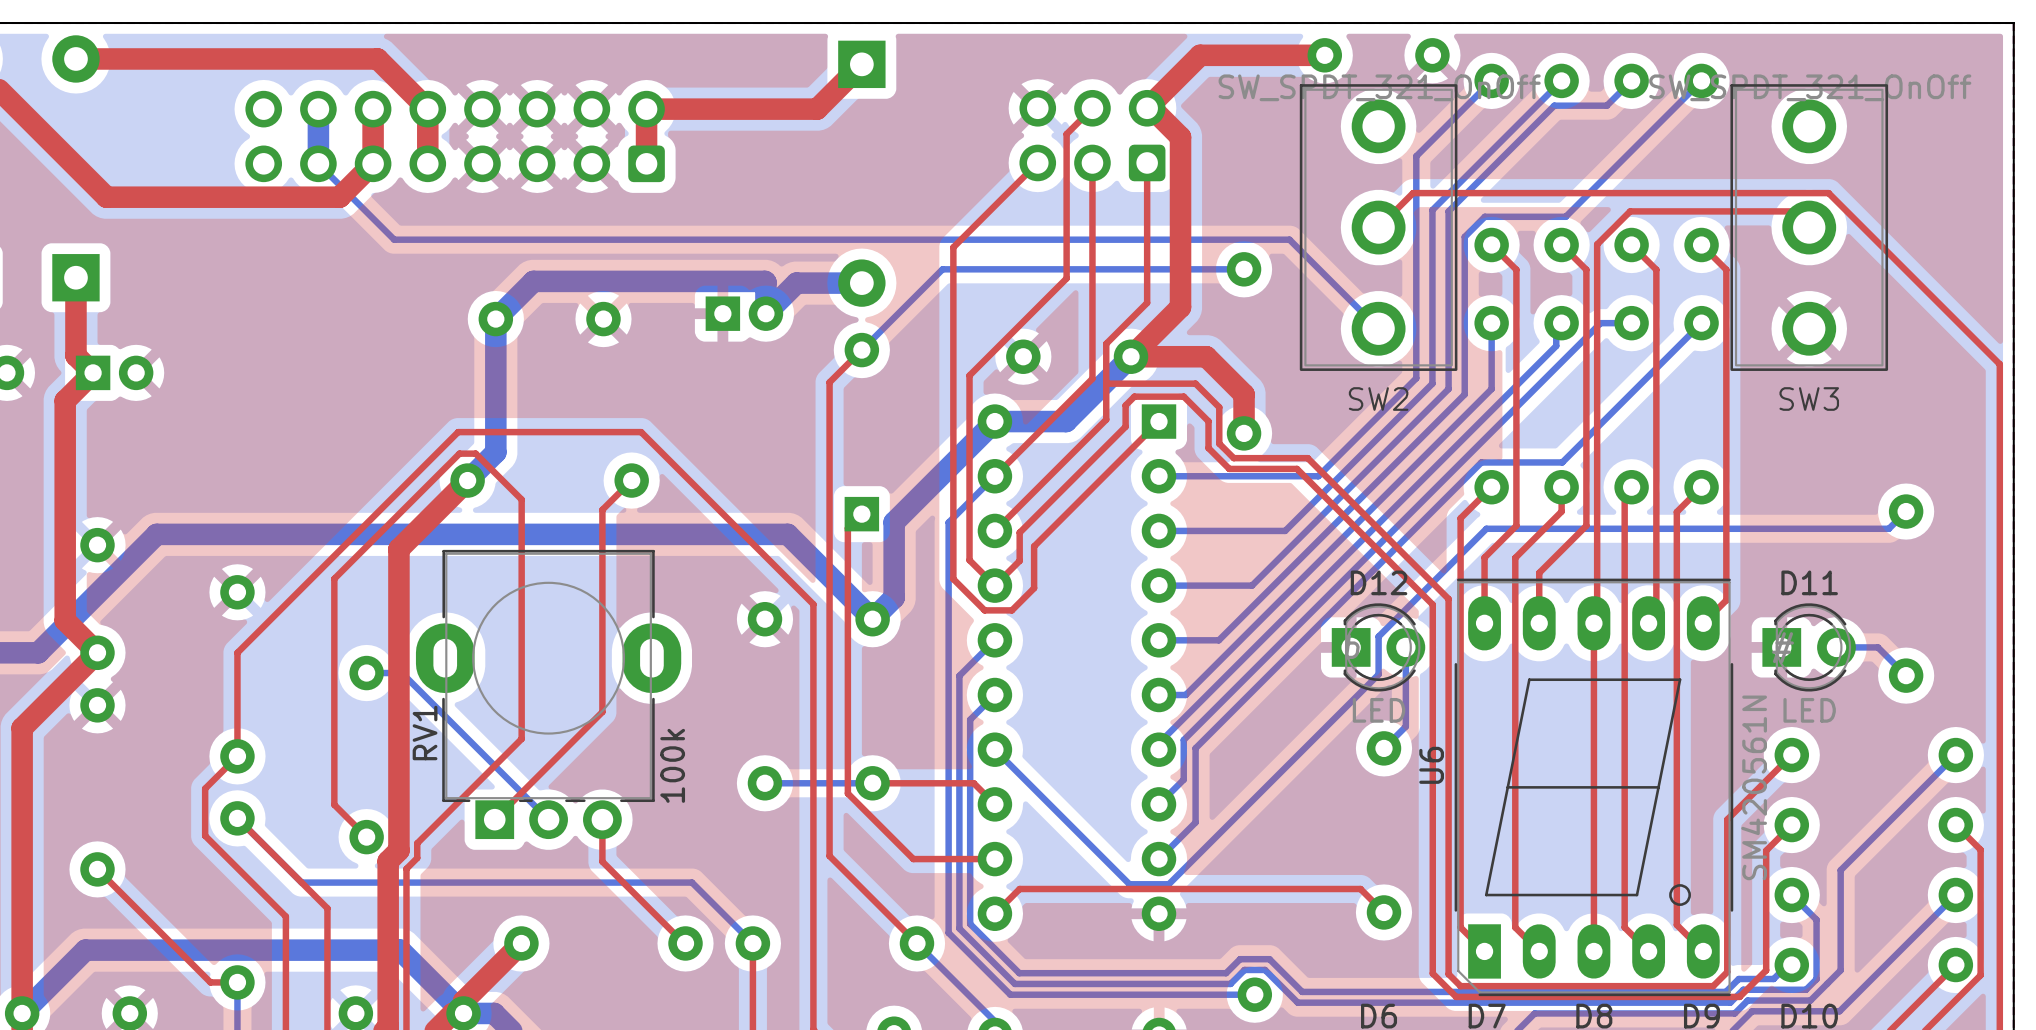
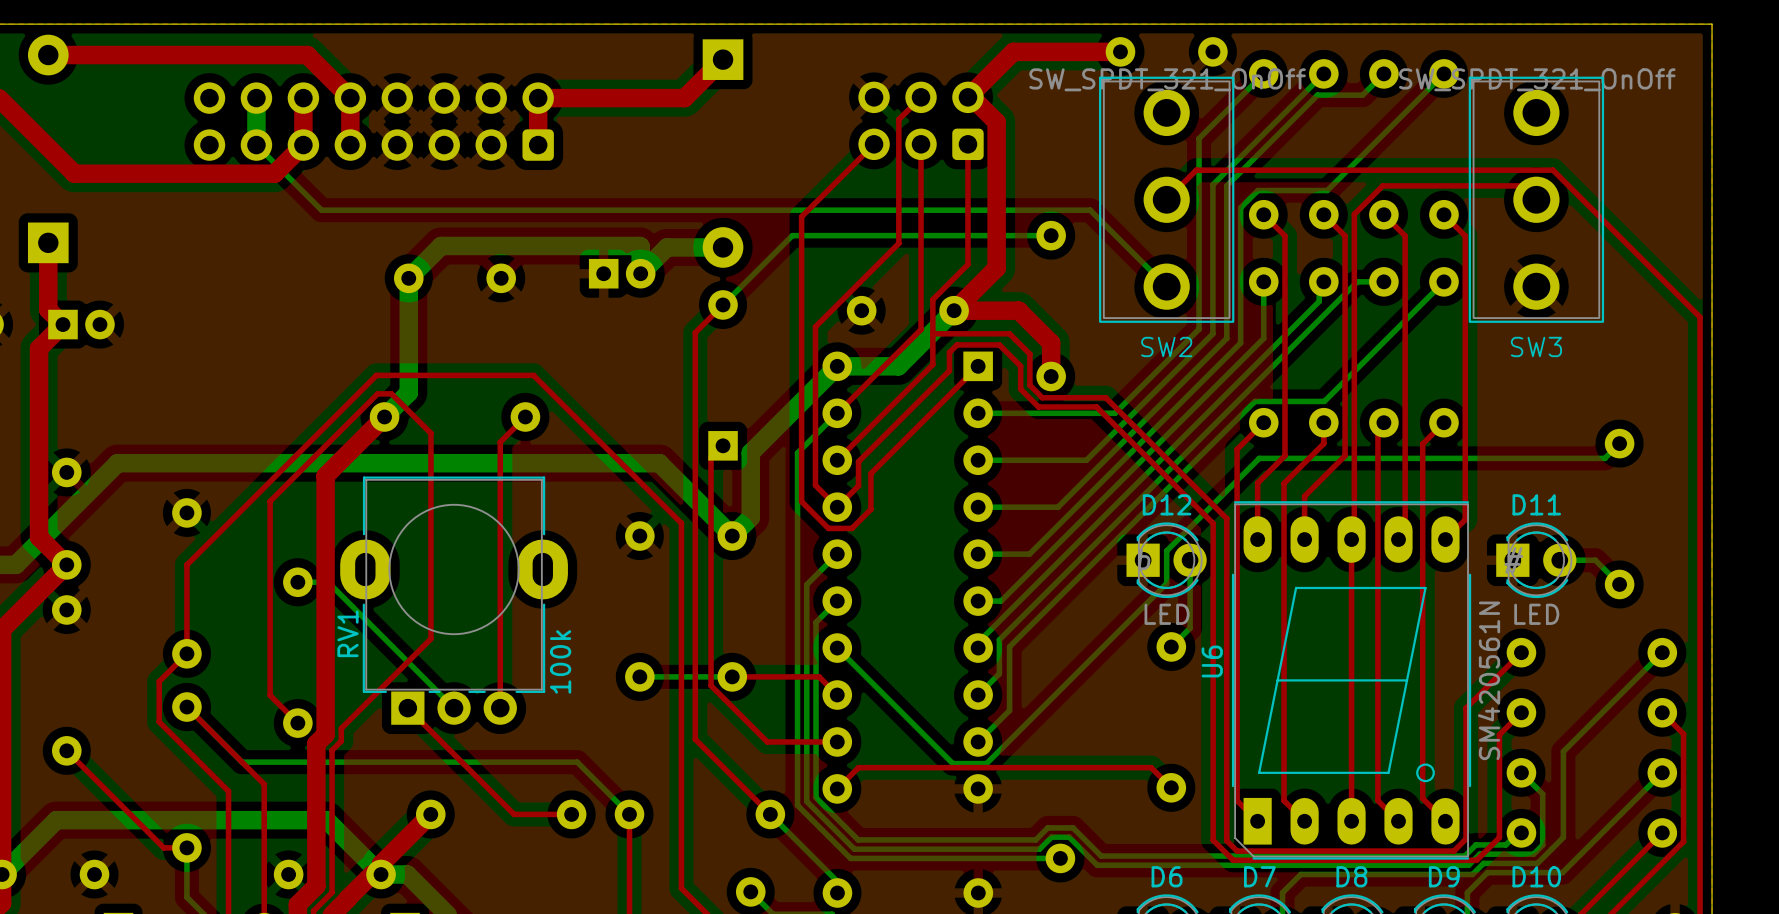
top track: (602, 712) (494, 819) -> (500, 615) (500, 708)
top track: (602, 819) (602, 861) (684, 943) -> (407, 708) (514, 814) (570, 814)

